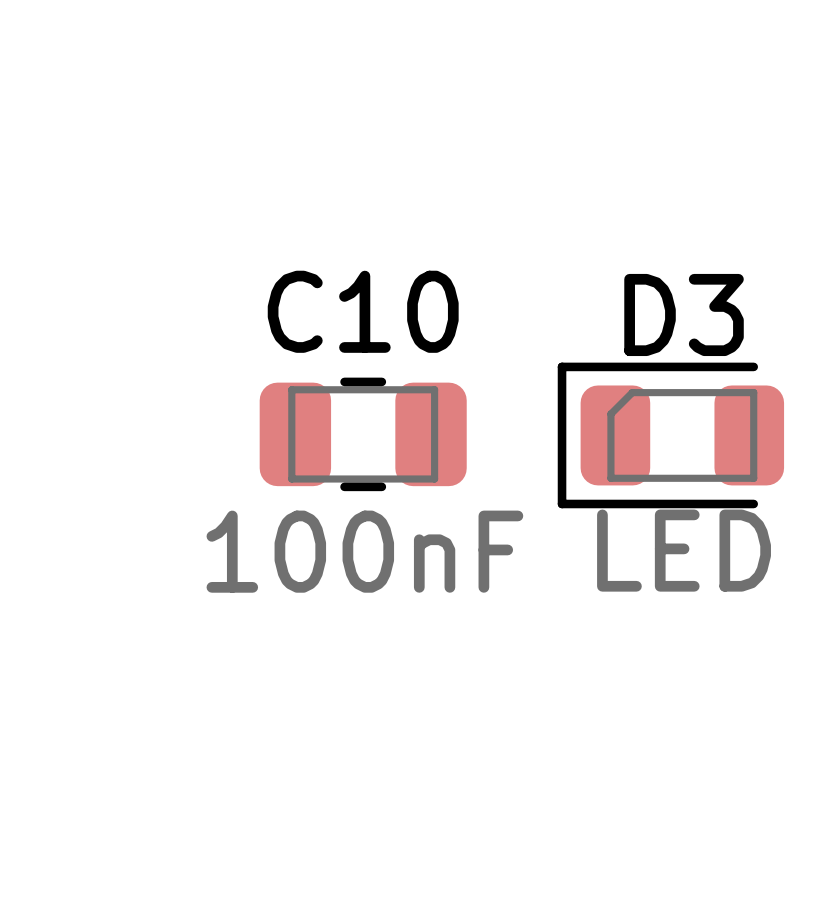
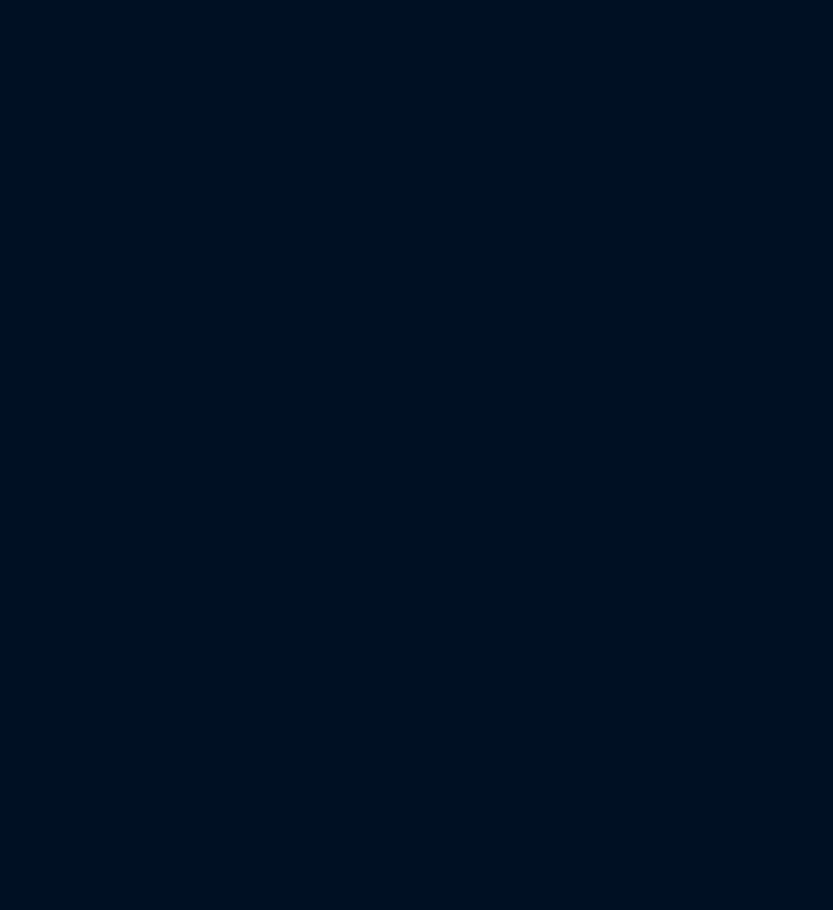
C10: 100nF (363, 434) -> none
D3: LED (670, 435) -> none

